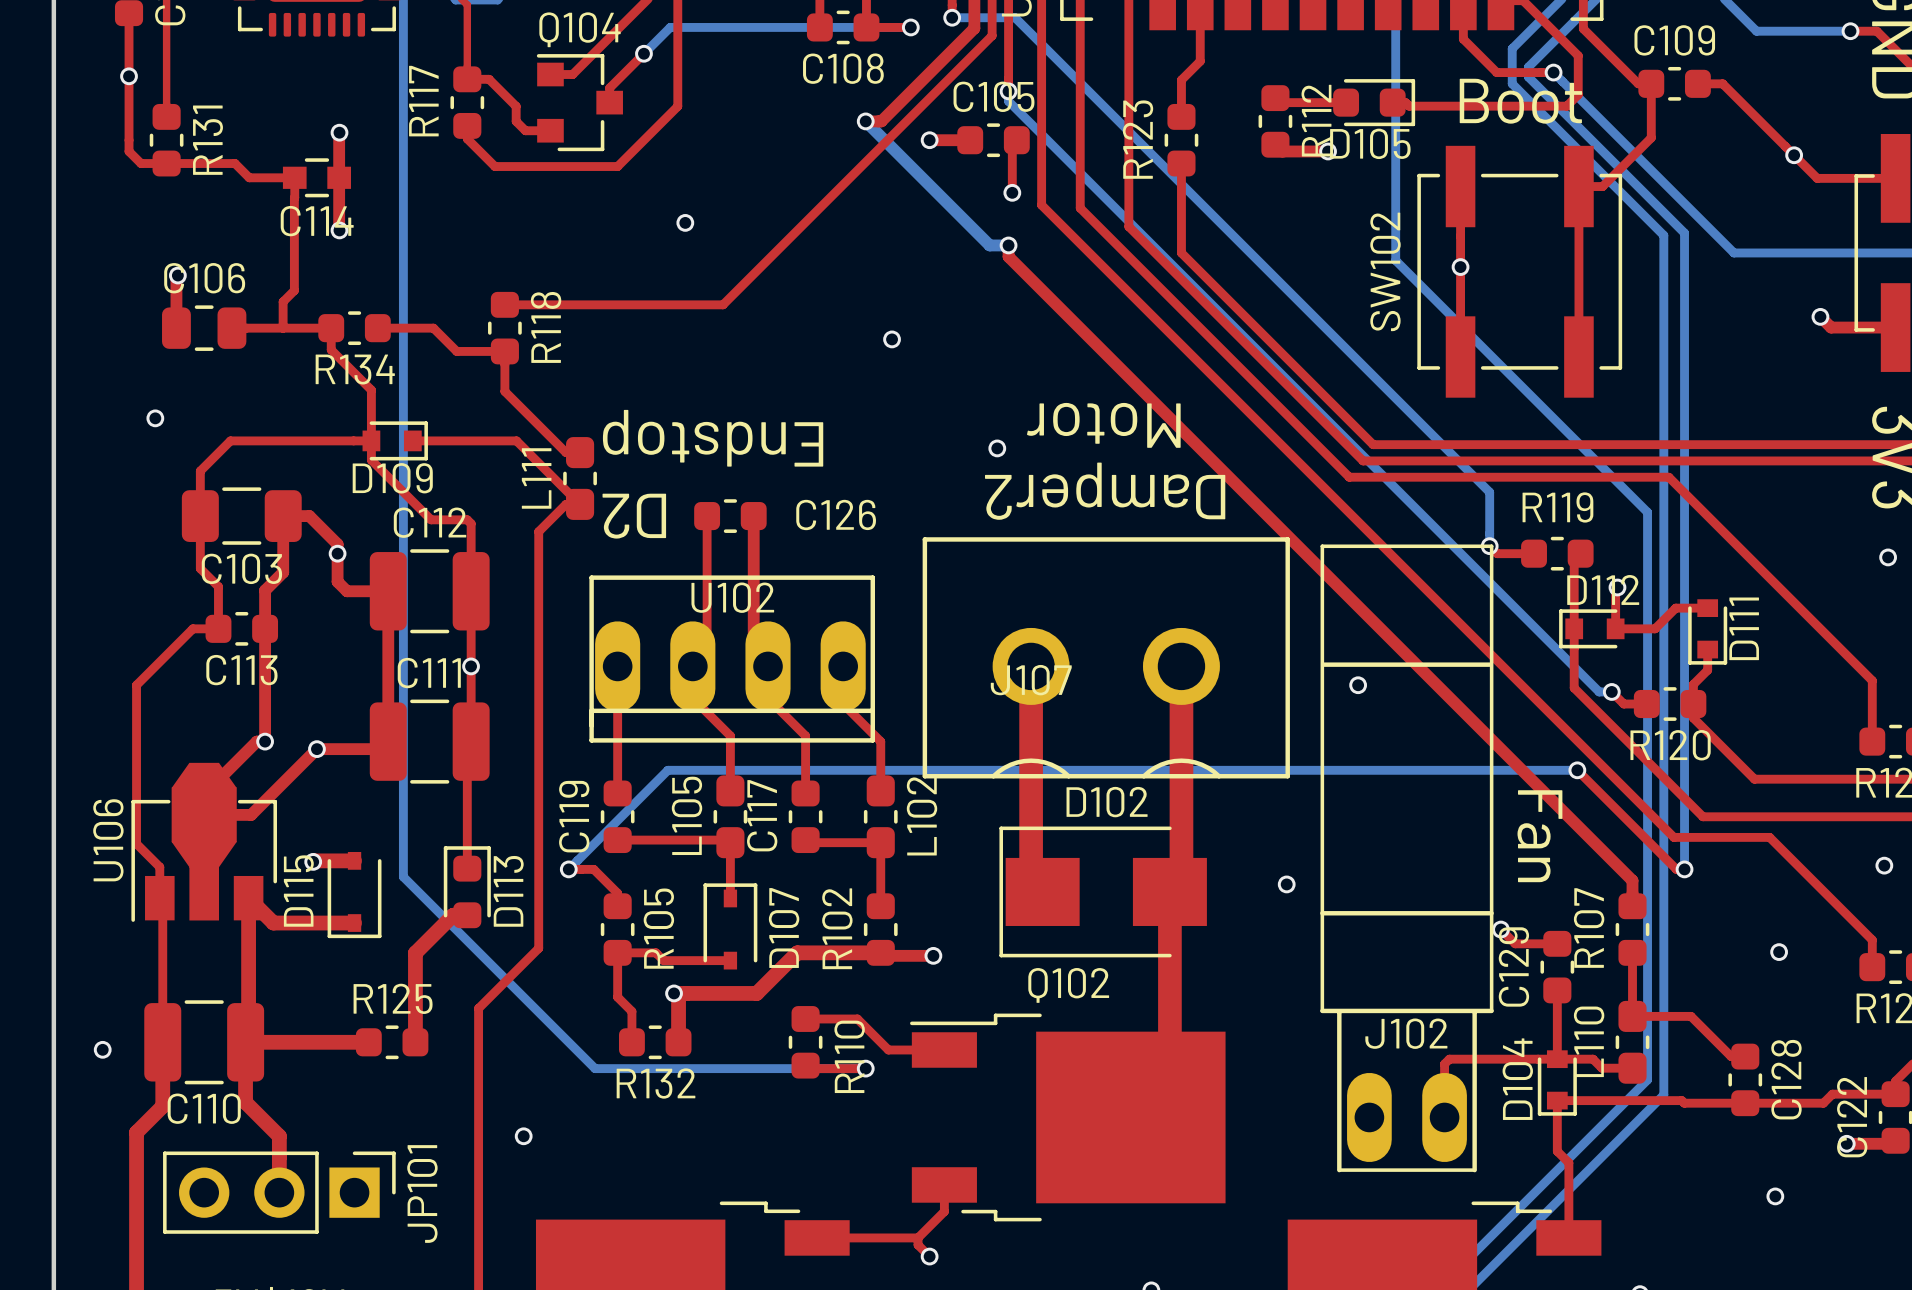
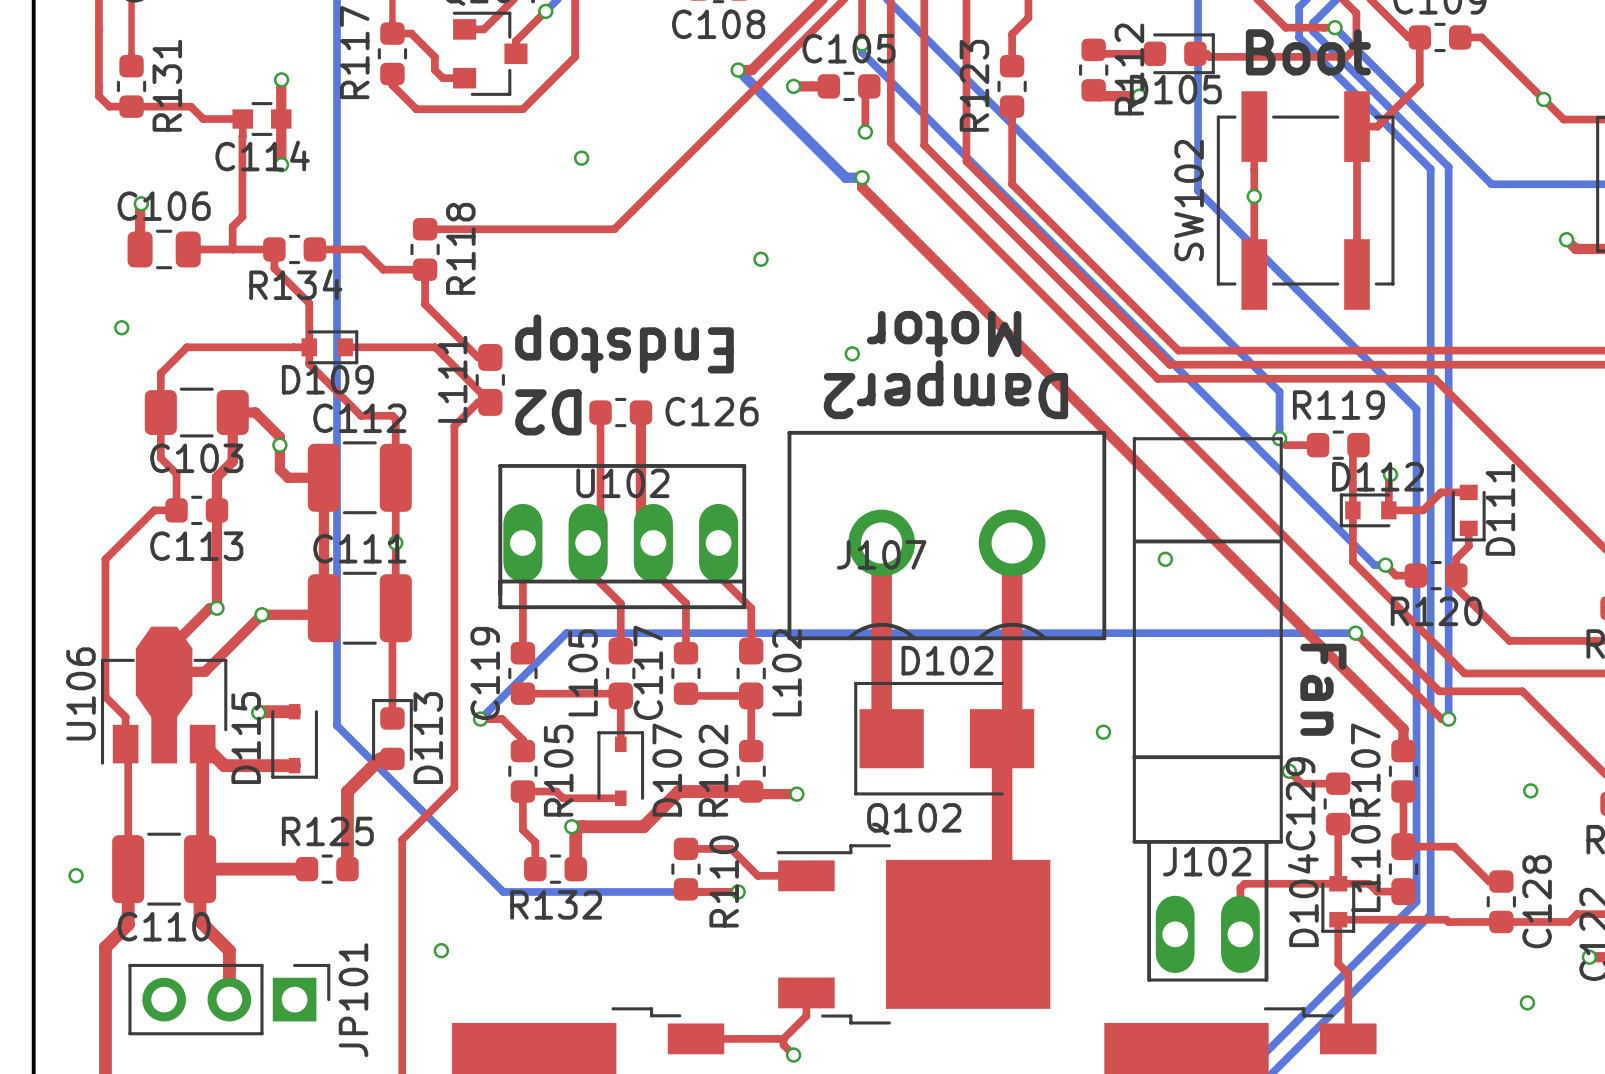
via: (129, 76) -> none

